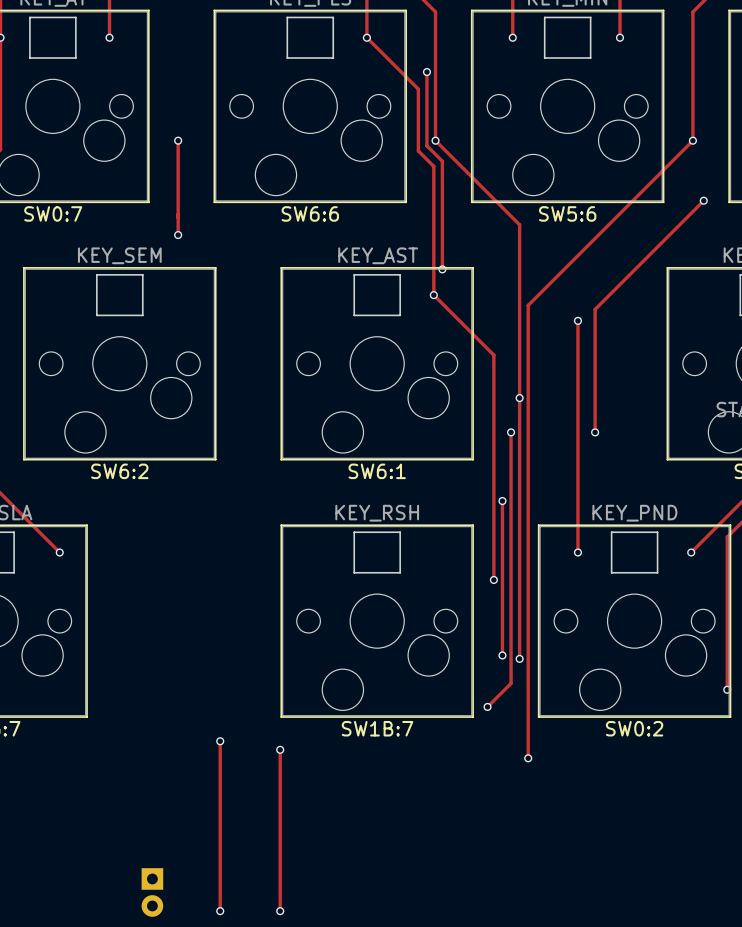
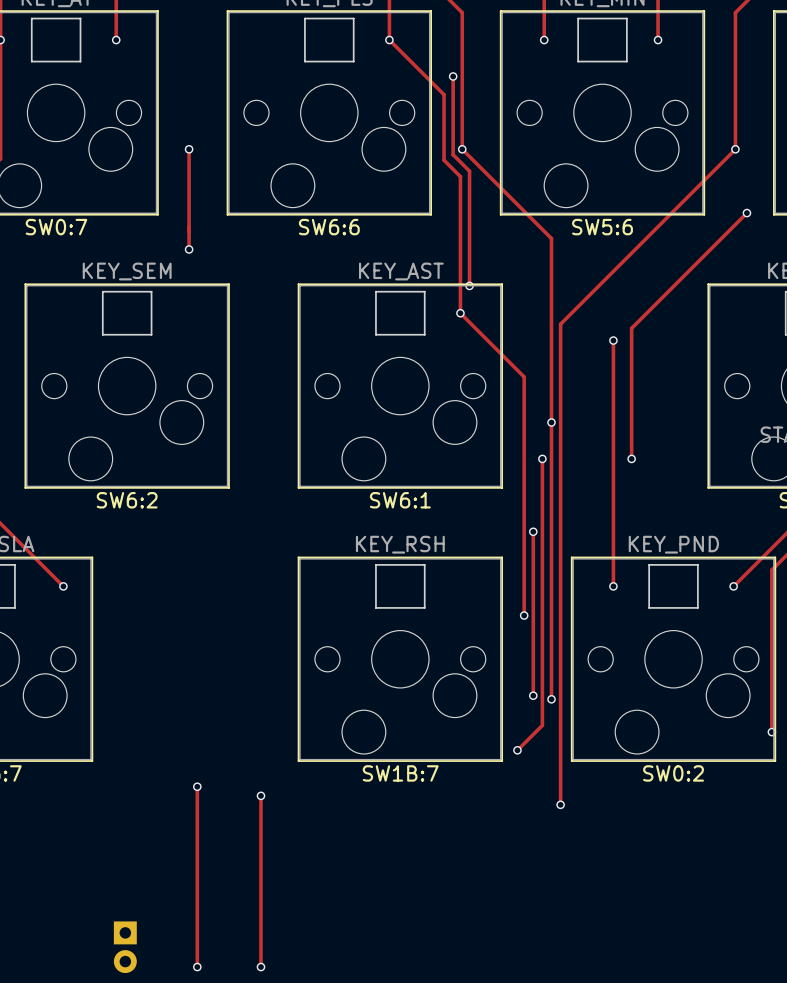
via: none -> (197, 786)
track: (220, 741) (220, 911) -> (197, 786) (197, 967)
via: (220, 741) -> none
via: none -> (260, 795)
track: (280, 749) (280, 911) -> (260, 795) (260, 967)
via: (280, 749) -> none
part position: (152, 892) -> (125, 947)
via: none -> (197, 967)
via: (220, 911) -> none
via: none -> (260, 967)
via: (280, 911) -> none

